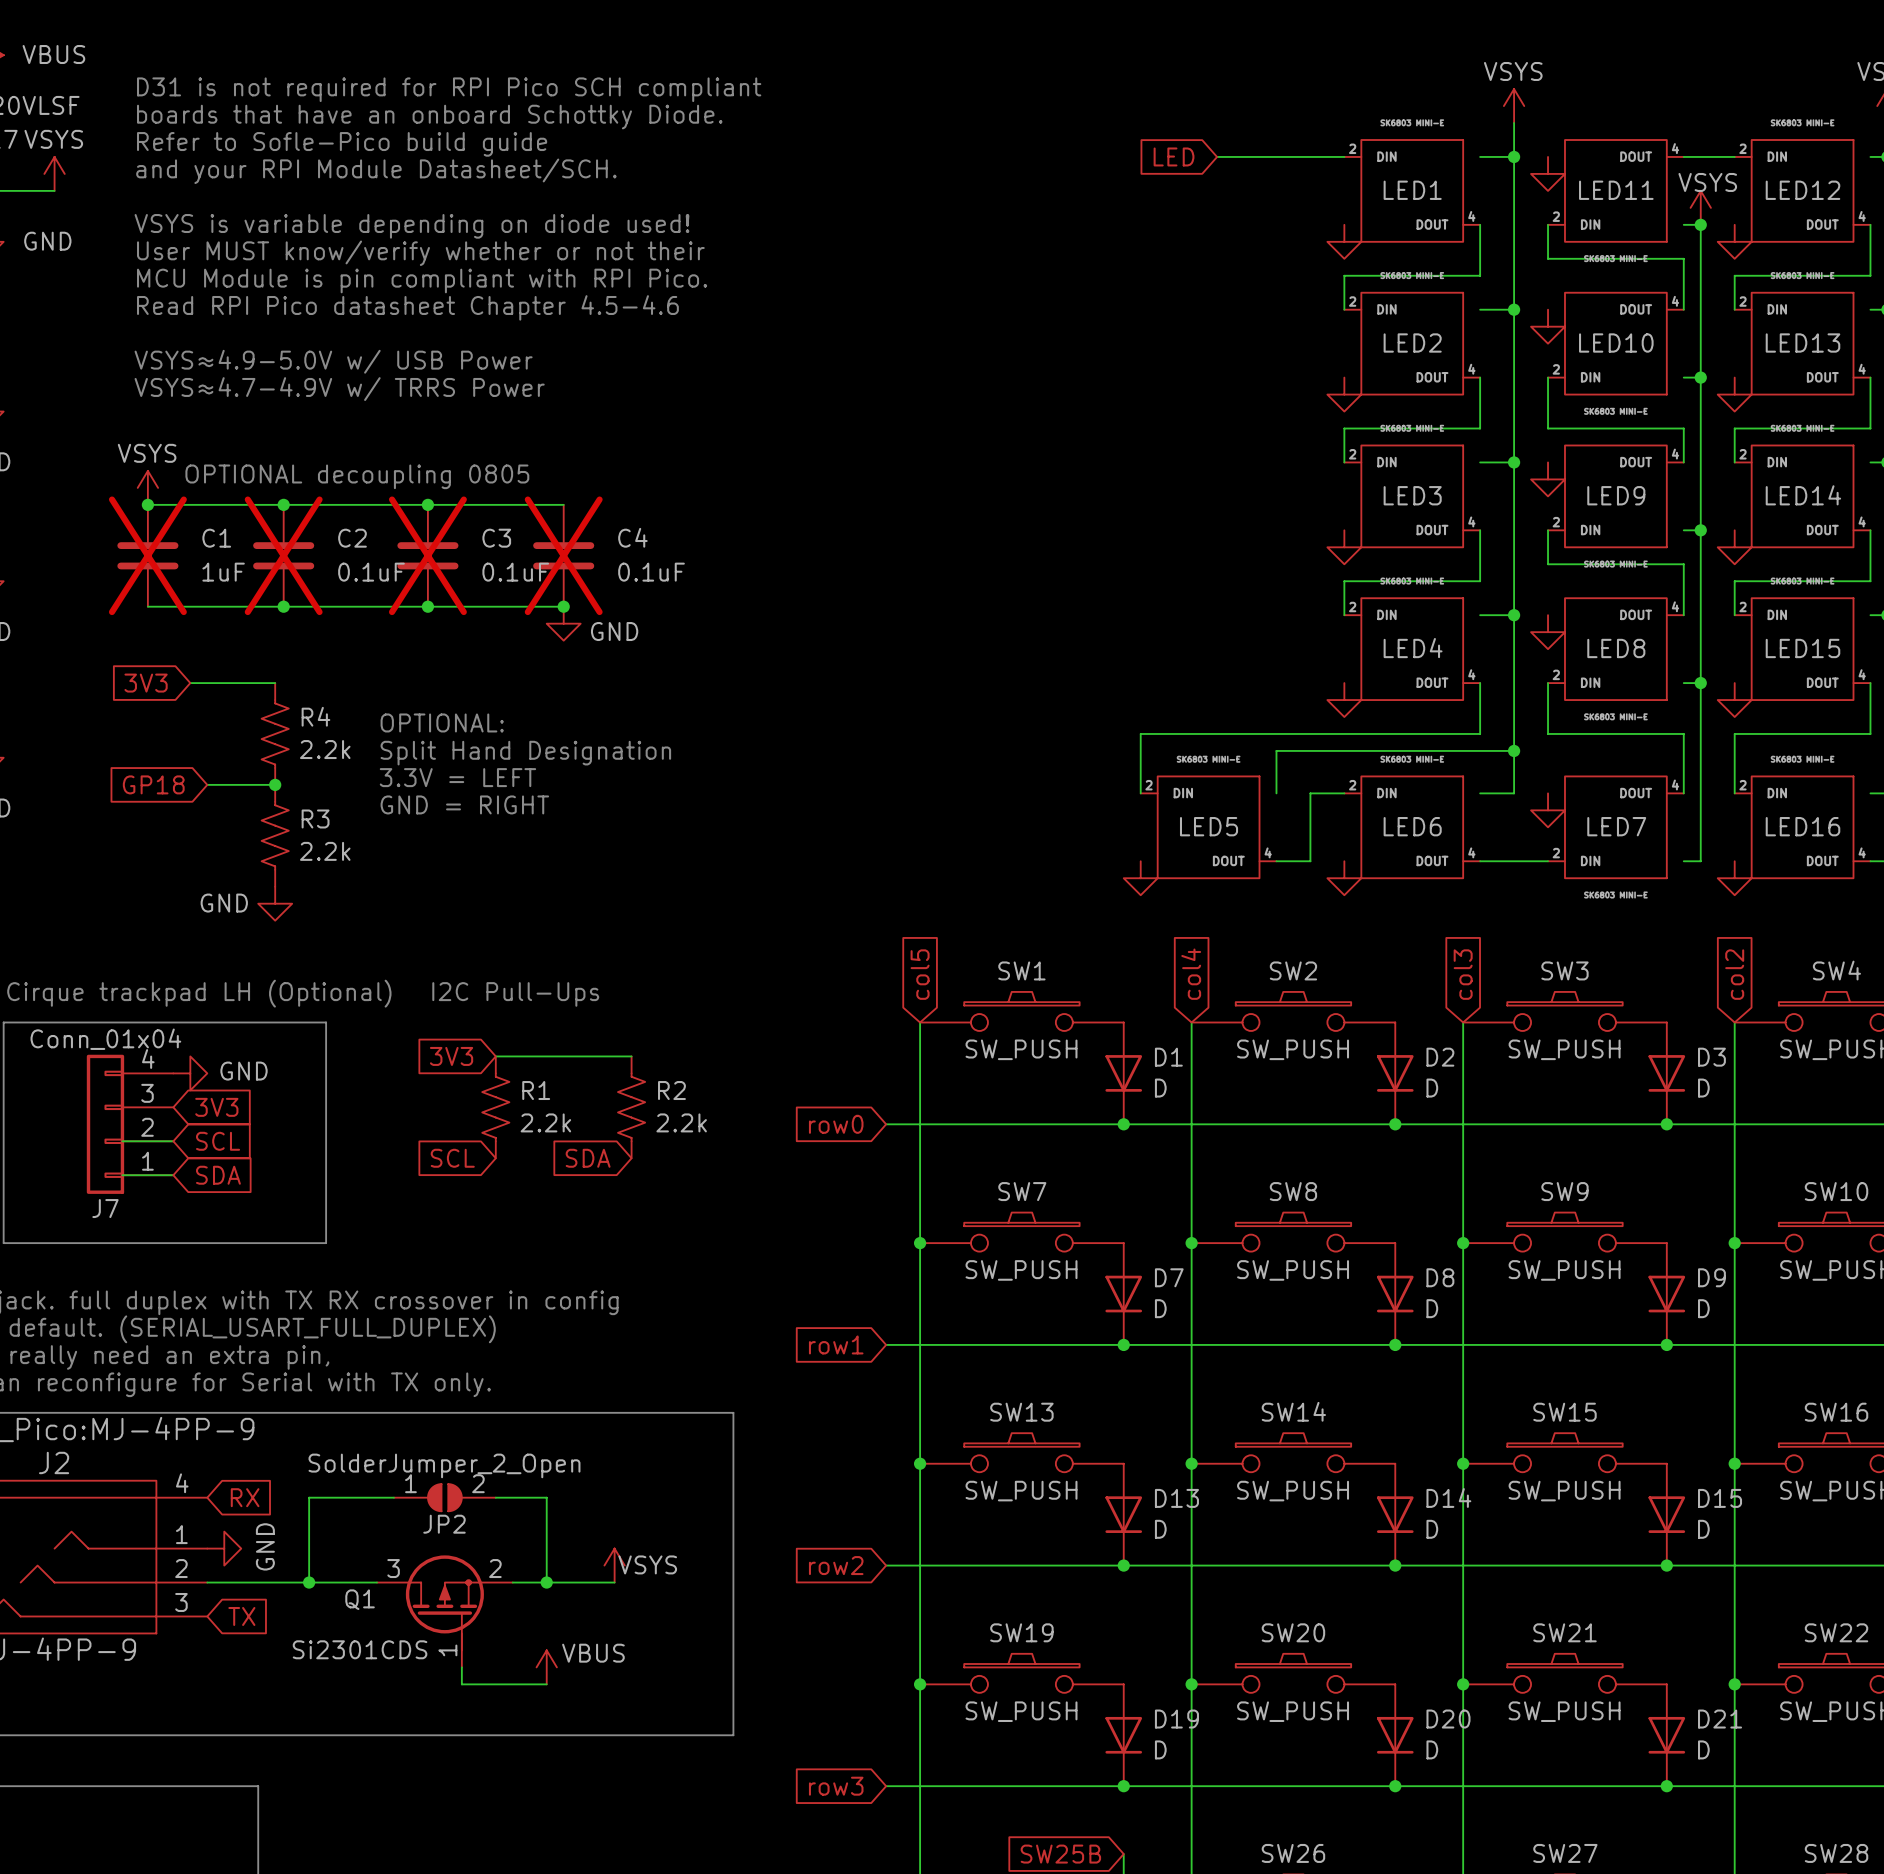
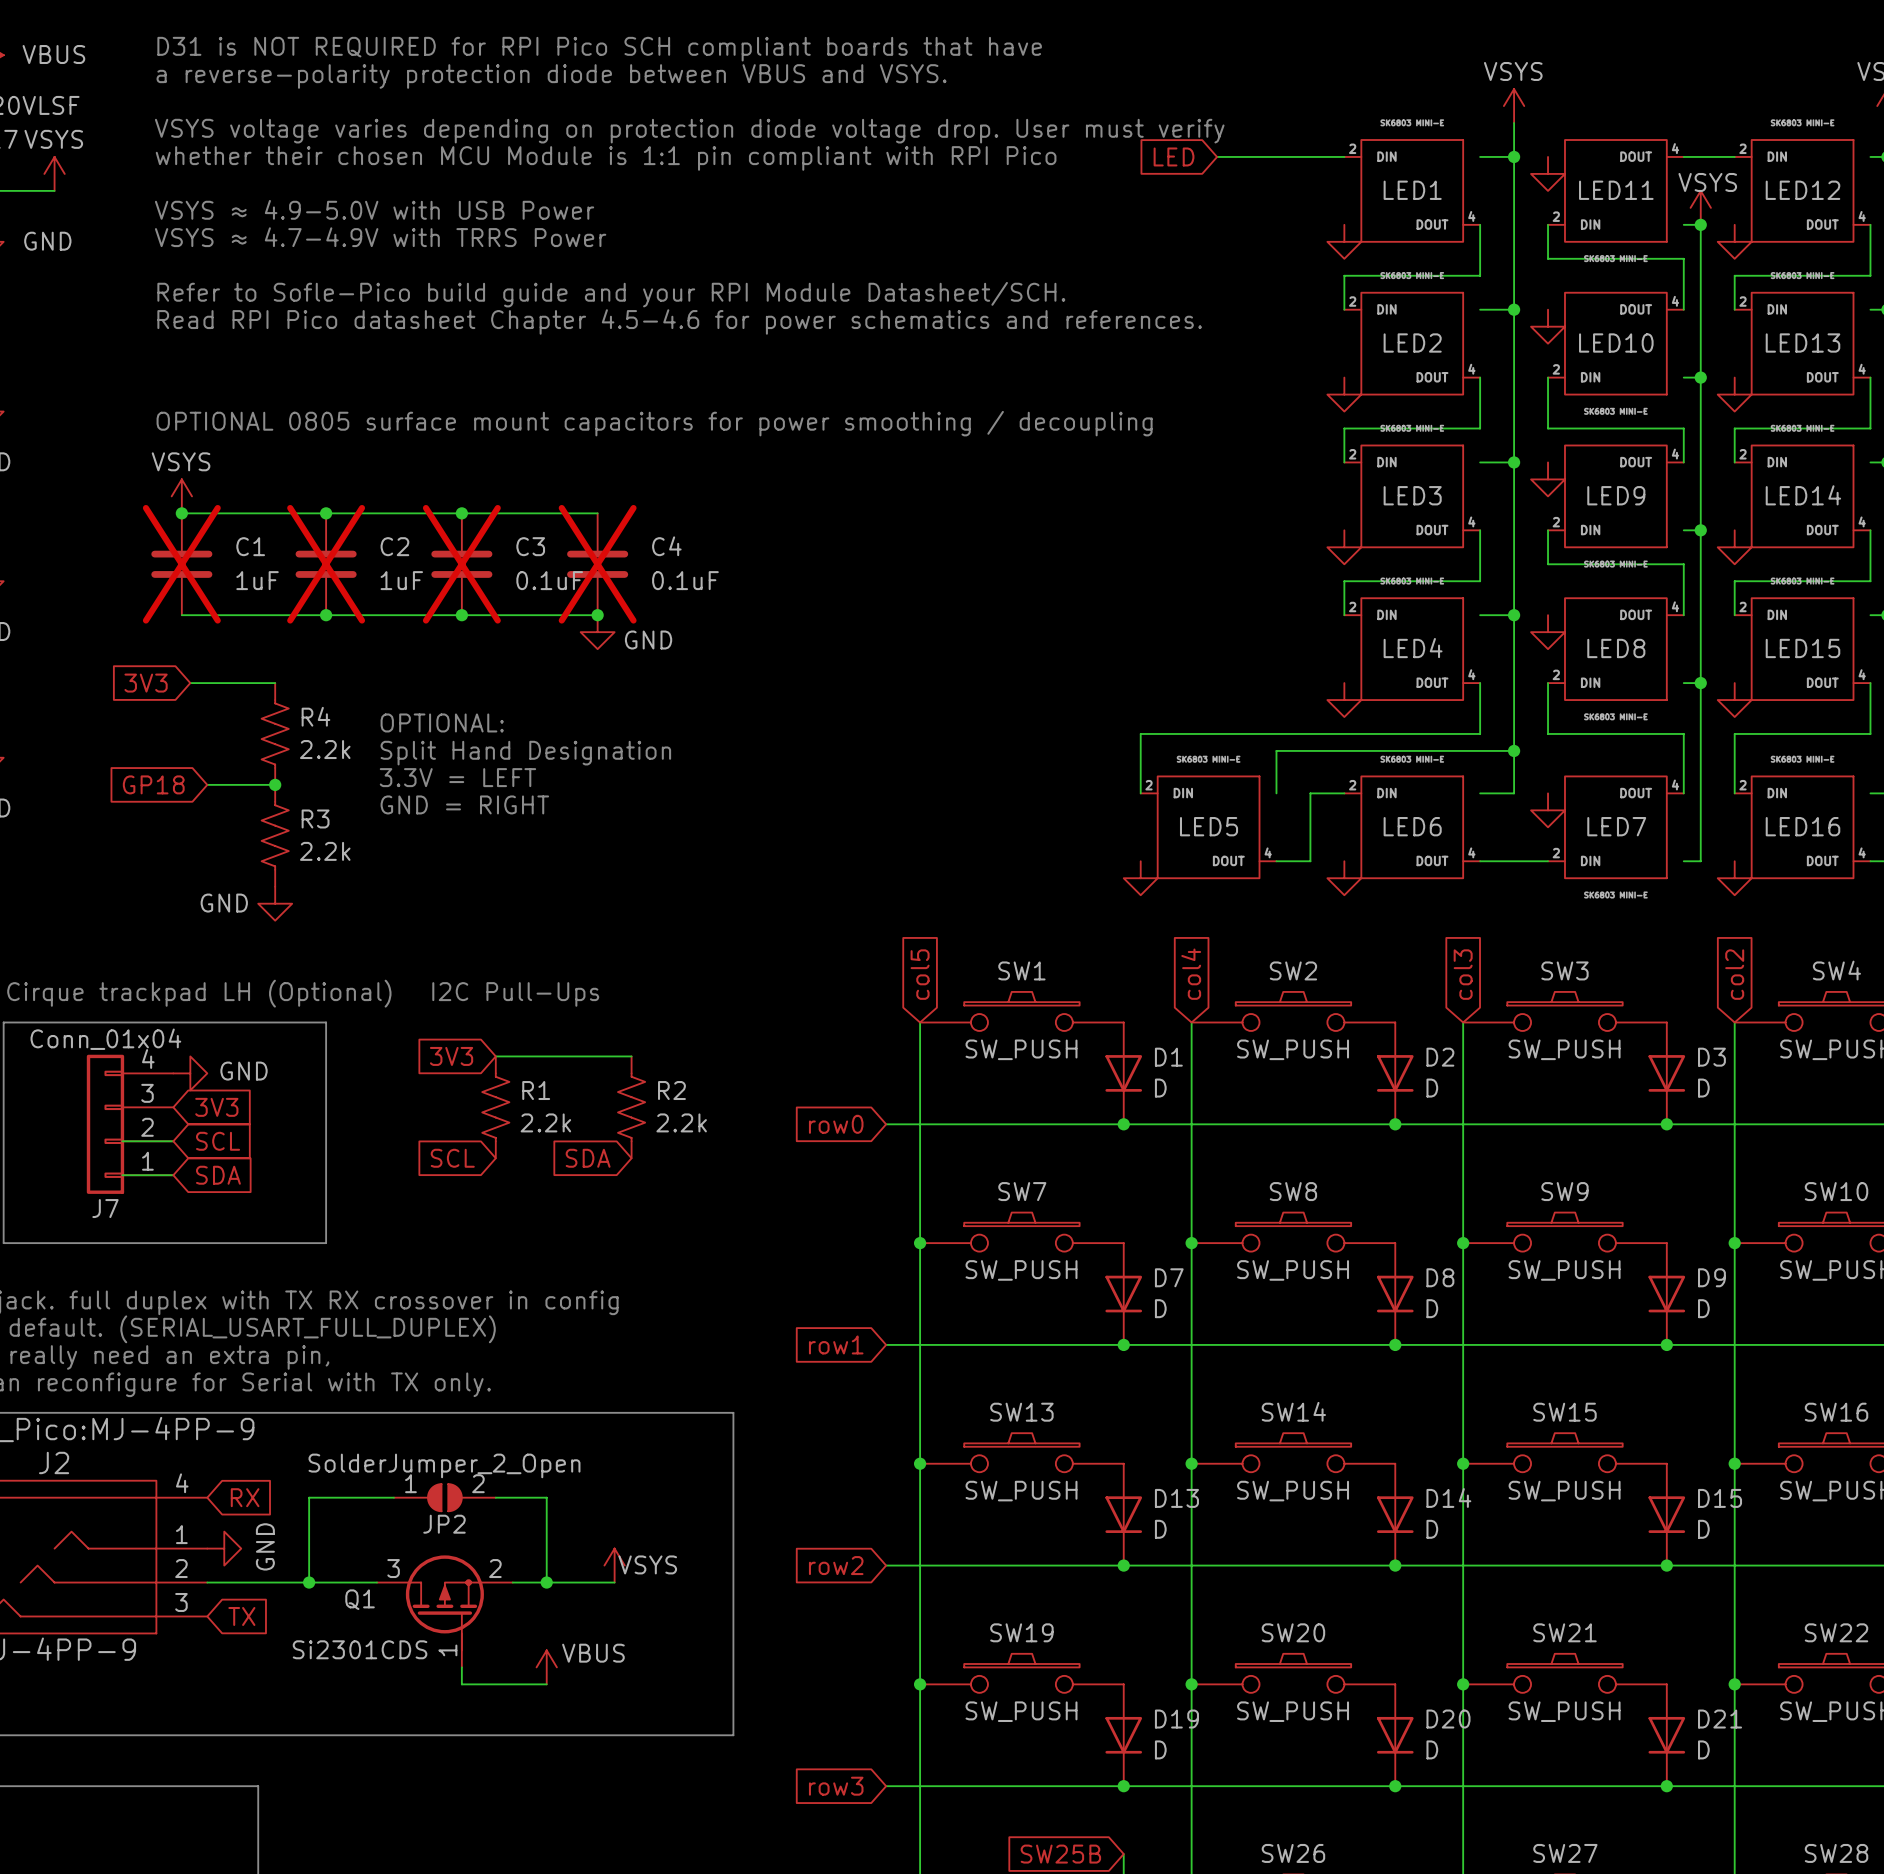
text: none -> D31 is NOT REQUIRED for RPI Pico SCH compliant boards that have (599, 49)
text: none -> a reverse-polarity protection diode between VBUS and VSYS. (551, 76)
text: D31 is not required for RPI Pico SCH compliant (449, 89) -> none
text: boards that have an onboard Schottky Diode. (429, 117) -> none
text: none -> VSYS voltage varies depending on protection diode voltage drop. User must verify (689, 131)
text: Refer to Sofle-Pico build guide (342, 144) -> none
text: none -> whether their chosen MCU Module is 1:1 pin compliant with RPI Pico (606, 158)
text: and your RPI Module Datasheet/SCH. (376, 171) -> none
text: none -> VSYS ≈ 4.9-5.0V with USB Power (374, 209)
text: VSYS is variable depending on diode used! (411, 226) -> none
text: none -> VSYS ≈ 4.7-4.9V with TRRS Power (380, 237)
text: User MUST know/verify whether or not their (420, 253) -> none
text: MCU Module is pin compliant with RPI Pico. (422, 280) -> none
text: none -> Refer to Sofle-Pico build guide and your RPI Module Datasheet/SCH. (611, 294)
text: Read RPI Pico datasheet Chapter 4.5-4.6 (407, 307) -> Read RPI Pico datasheet Chapter 4.5-4.6 for power schematics and references. (679, 321)
text: VSYS≈4.9-5.0V w/ USB Power (333, 361) -> none
text: VSYS≈4.7-4.9V w/ TRRS Power (339, 389) -> none
text: none -> OPTIONAL 0805 surface mount capacitors for power smoothing / decoupling (654, 423)
text: OPTIONAL decoupling 0805 (357, 476) -> none
power symbol position: VSYS (147, 487) -> VSYS (181, 496)
wire: (147, 504) (563, 504) -> (181, 513) (597, 513)
junction position: (147, 504) -> (181, 513)
junction position: (283, 504) -> (326, 513)
junction position: (427, 504) -> (461, 513)
C1 position: (147, 555) -> (181, 564)
C2 position: (283, 555) -> (326, 564)
C3 position: (427, 555) -> (461, 564)
C4 position: (563, 555) -> (597, 564)
C2 value: 0.1uF (371, 572) -> 1uF (401, 580)
wire: (147, 606) (563, 606) -> (181, 615) (597, 615)
junction position: (283, 606) -> (326, 615)
junction position: (427, 606) -> (461, 615)
junction position: (563, 606) -> (597, 615)
power symbol position: GND (563, 623) -> GND (597, 632)

